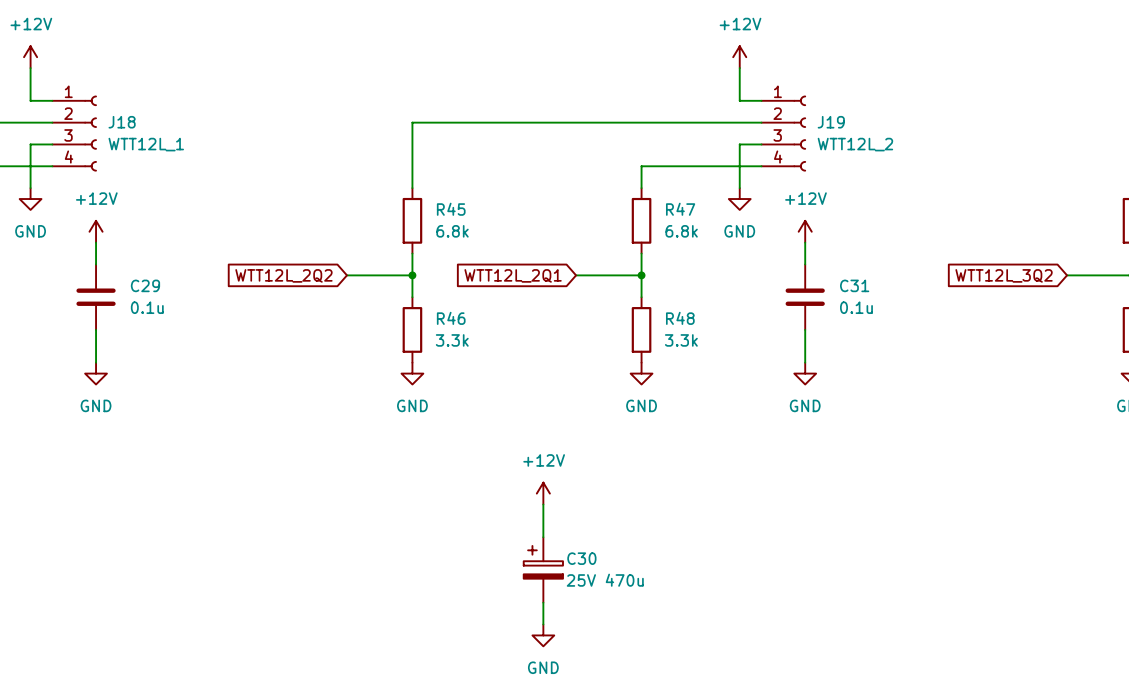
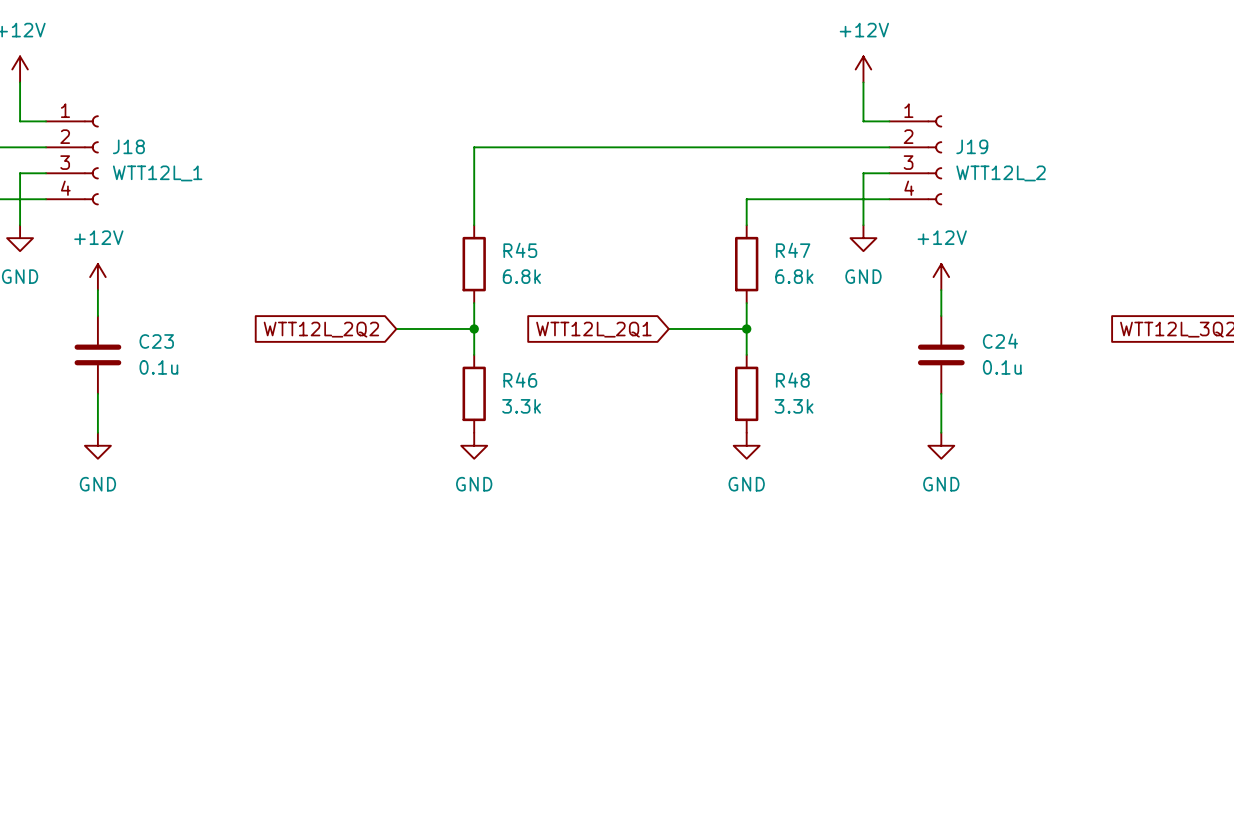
C29 name: C29 (145, 285) -> C23 (156, 341)
C31 name: C31 (854, 285) -> C24 (1000, 341)
power symbol: +12V (543, 493) -> none
wire: (543, 504) (543, 537) -> none
C30: 25V 470u (543, 569) -> none
wire: (543, 602) (543, 624) -> none
power symbol: GND (543, 635) -> none

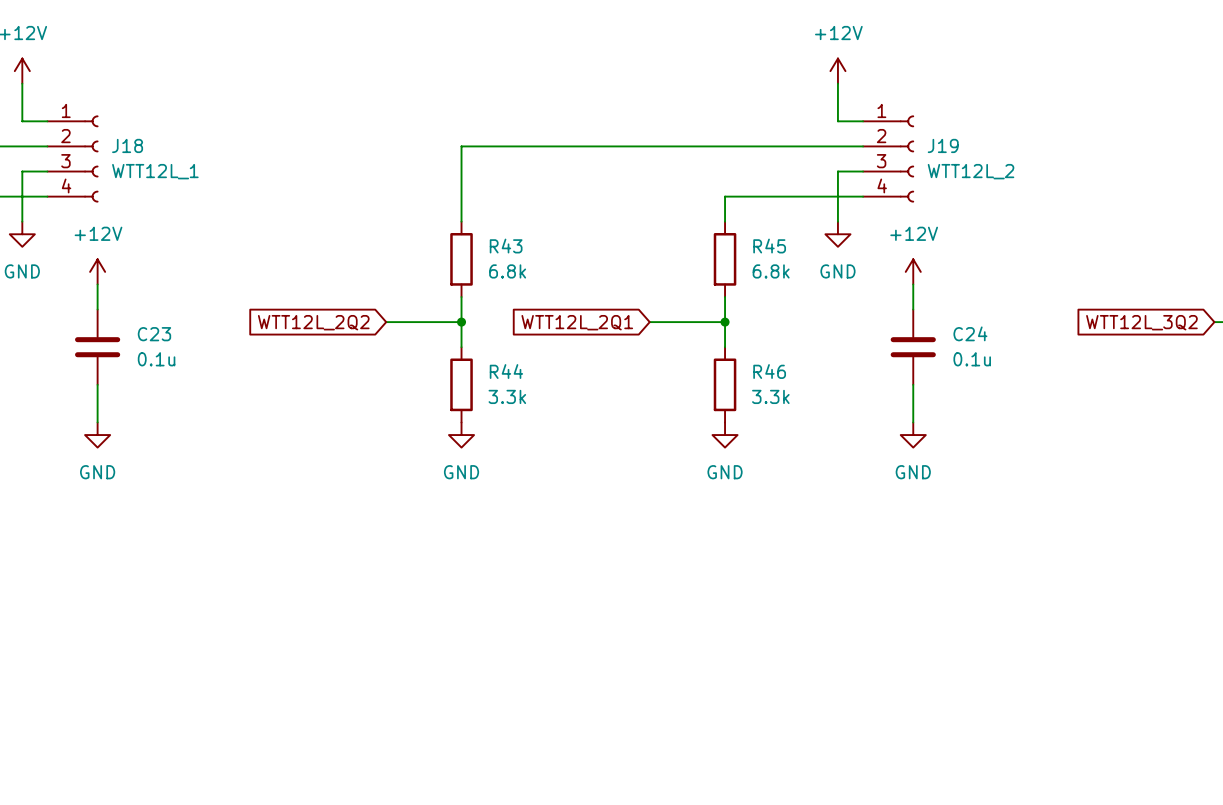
R45 name: R45 (520, 250) -> R43 (506, 246)
R47 name: R47 (793, 250) -> R45 (769, 246)
R46 name: R46 (520, 380) -> R44 (506, 371)
R48 name: R48 (792, 380) -> R46 (769, 371)

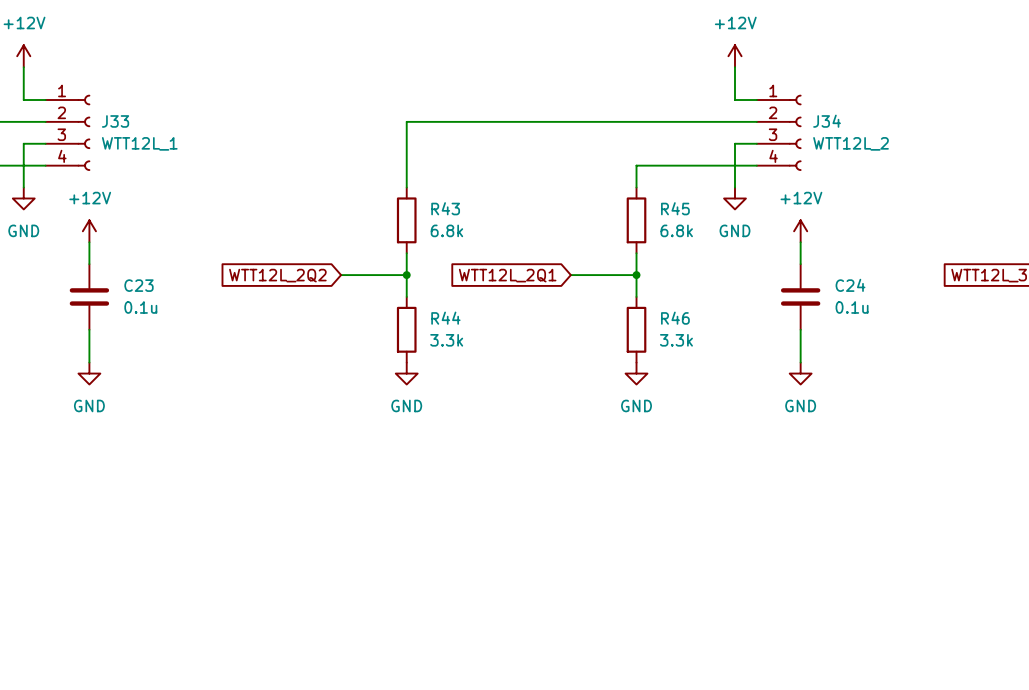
J18 name: J18 (127, 145) -> J33 (115, 121)
J19 name: J19 (943, 145) -> J34 (827, 121)

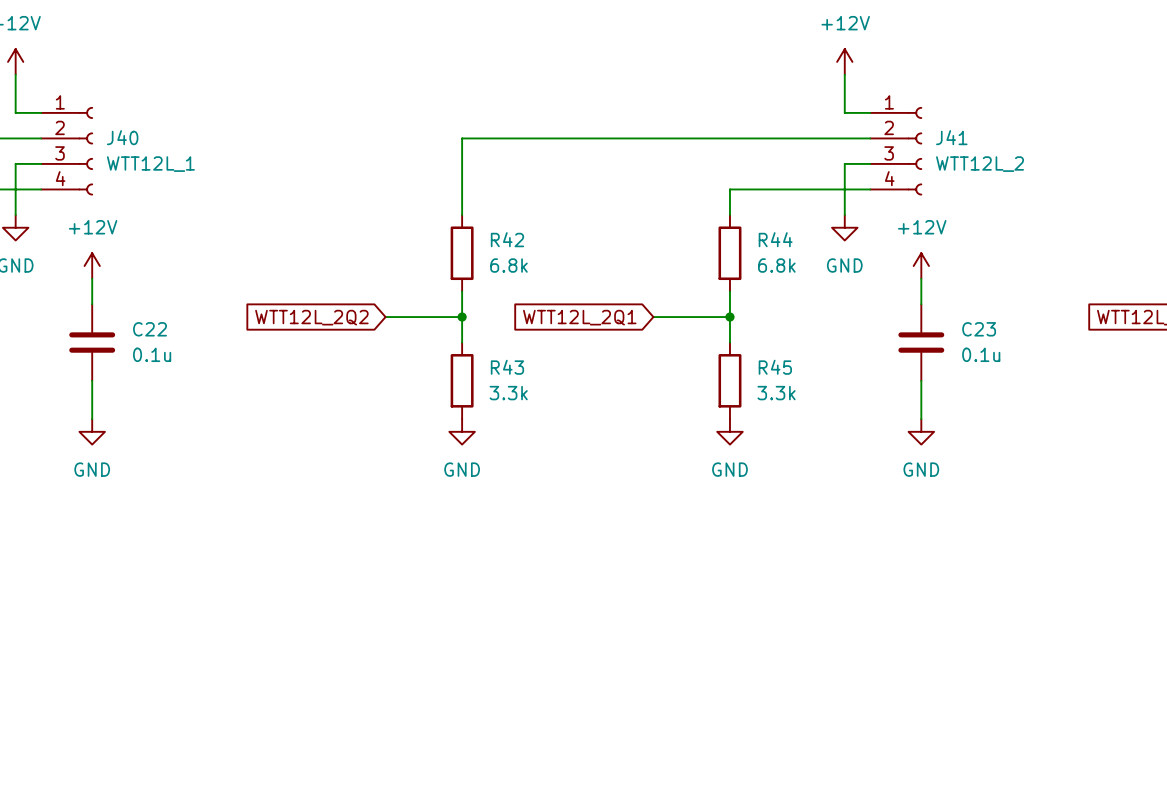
J33 name: J33 (115, 121) -> J40 (122, 137)
J34 name: J34 (827, 121) -> J41 (951, 137)
R43 name: R43 (445, 208) -> R42 (507, 239)
R45 name: R45 (675, 208) -> R44 (775, 239)
C23 name: C23 (138, 285) -> C22 (150, 329)
C24 name: C24 (850, 285) -> C23 (979, 329)
R44 name: R44 (445, 318) -> R43 (507, 367)
R46 name: R46 (675, 318) -> R45 (775, 367)

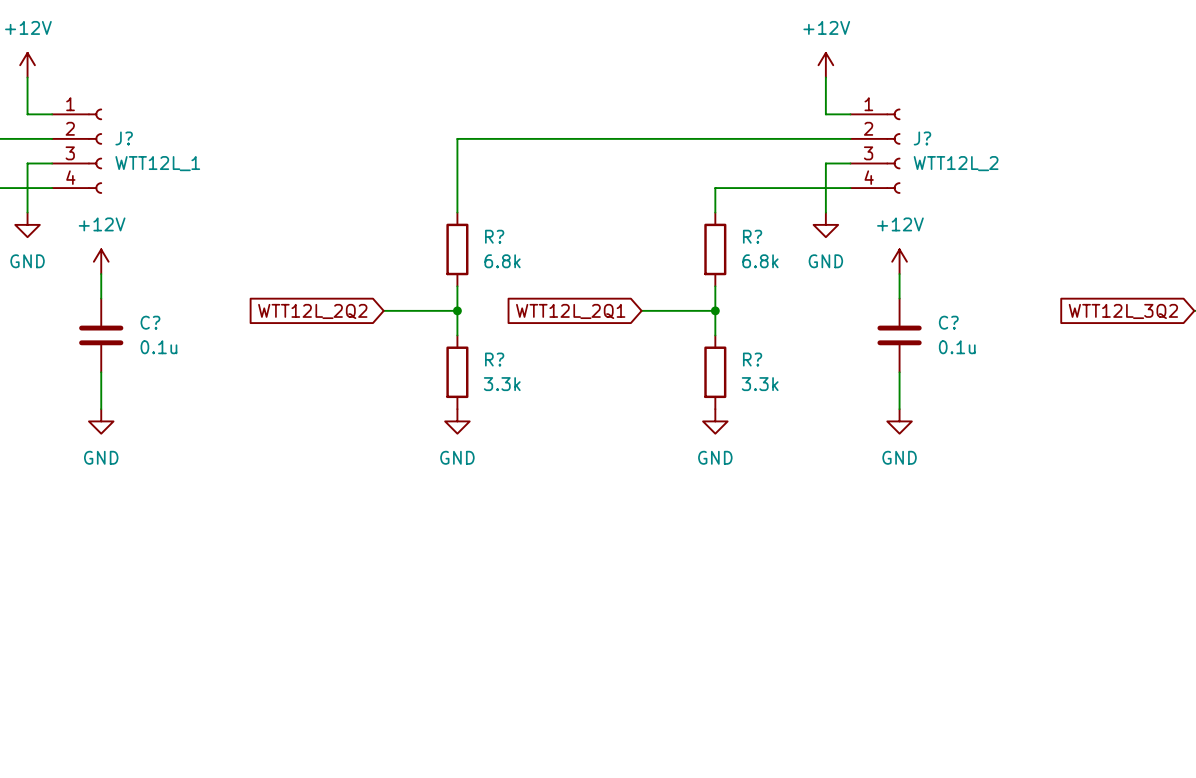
J40 name: J40 (122, 137) -> J? (124, 138)
J41 name: J41 (951, 137) -> J? (922, 138)
R42 name: R42 (507, 239) -> R? (494, 236)
R44 name: R44 (775, 239) -> R? (752, 236)
C22 name: C22 (150, 329) -> C? (150, 322)
C23 name: C23 (979, 329) -> C? (948, 322)
R43 name: R43 (507, 367) -> R? (494, 359)
R45 name: R45 (775, 367) -> R? (752, 359)

